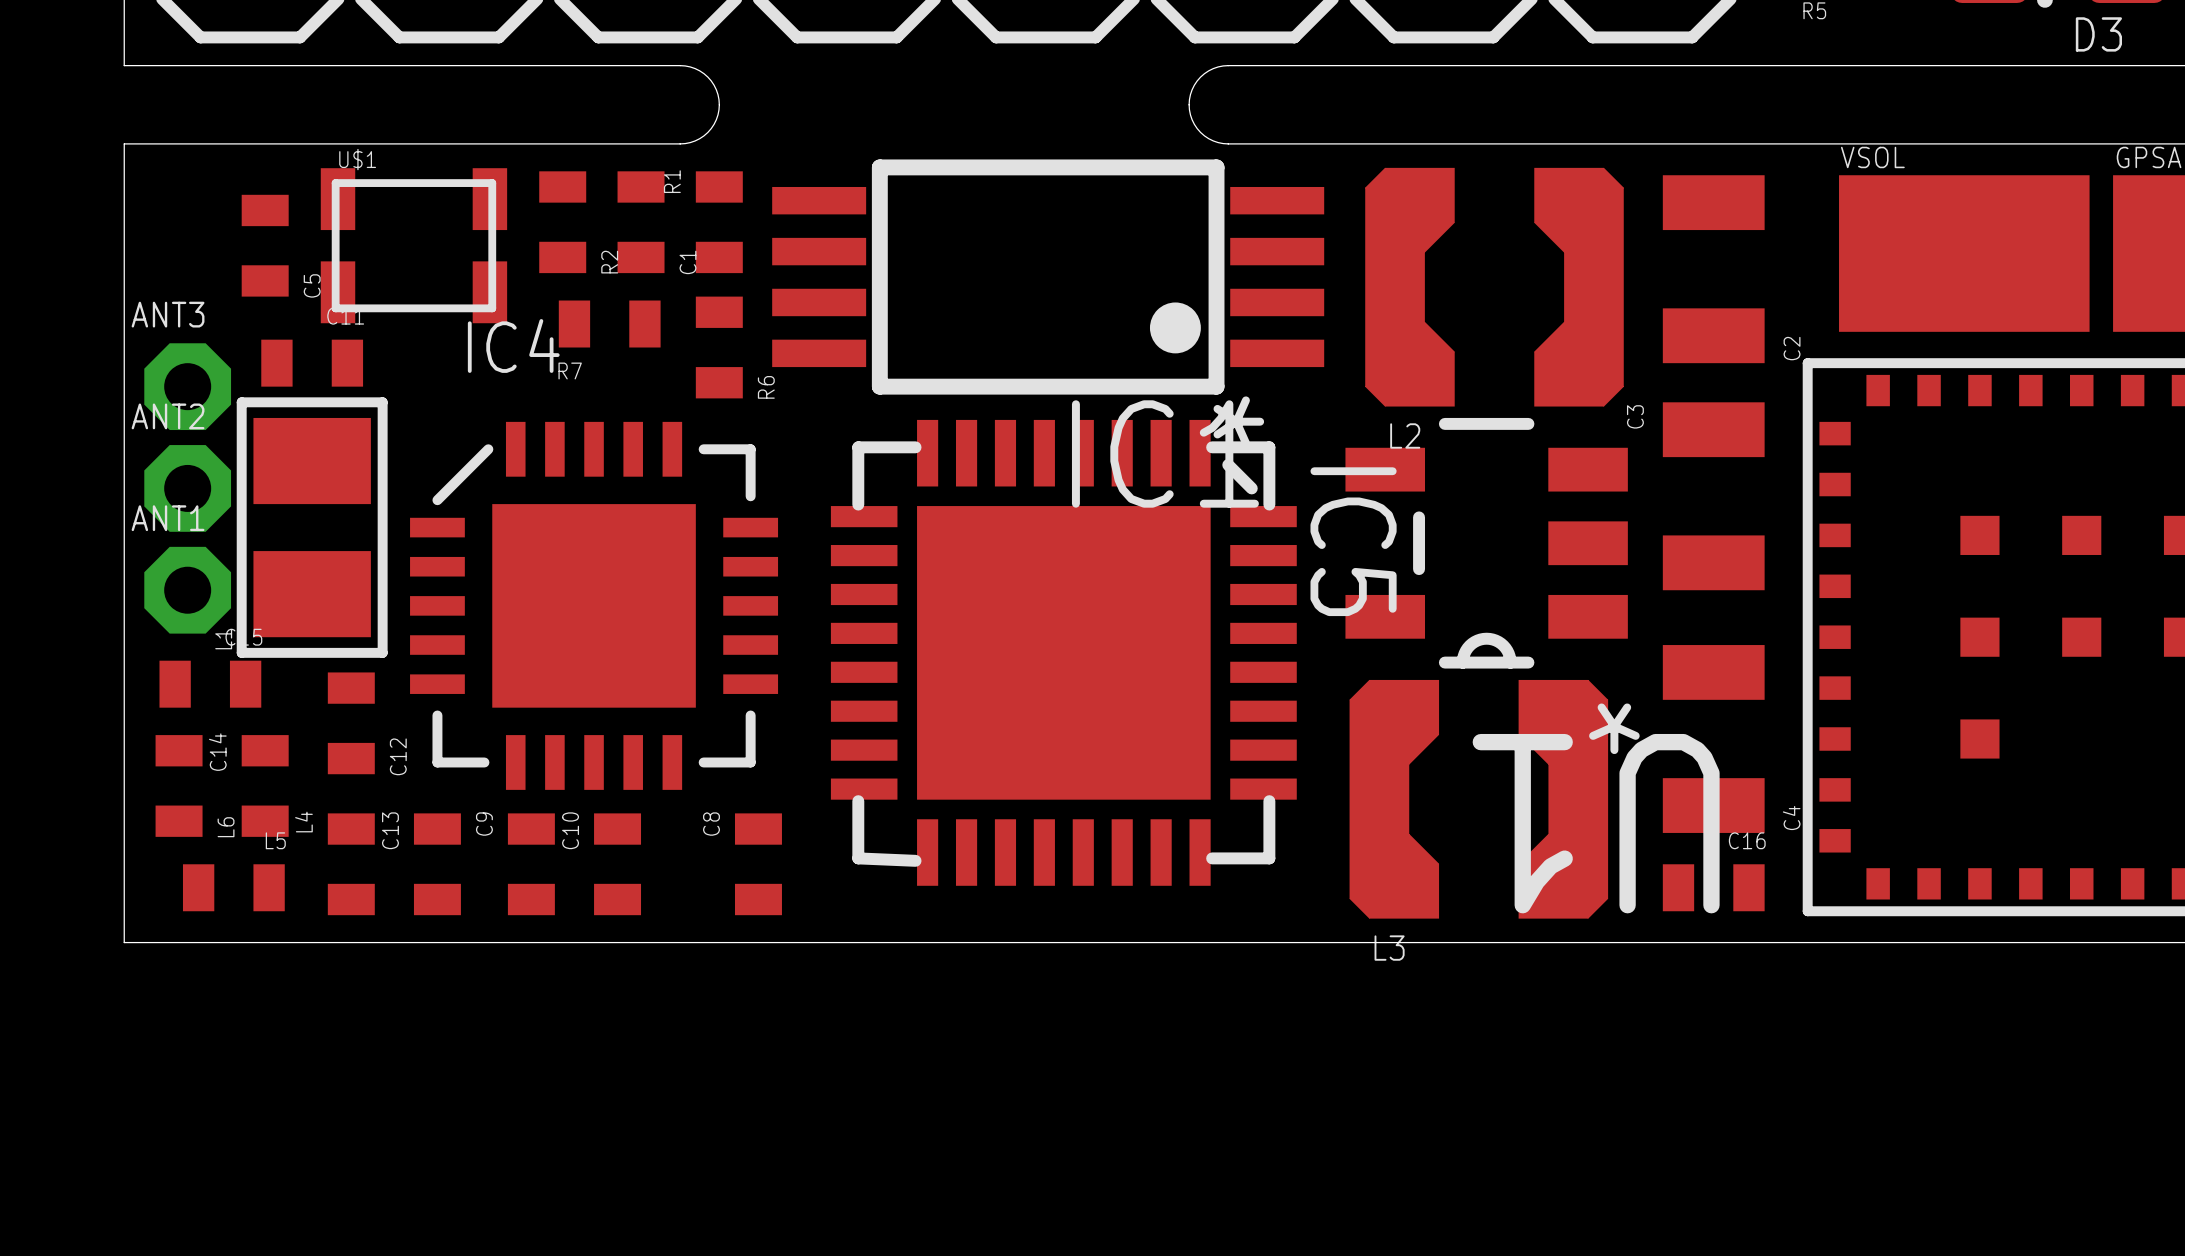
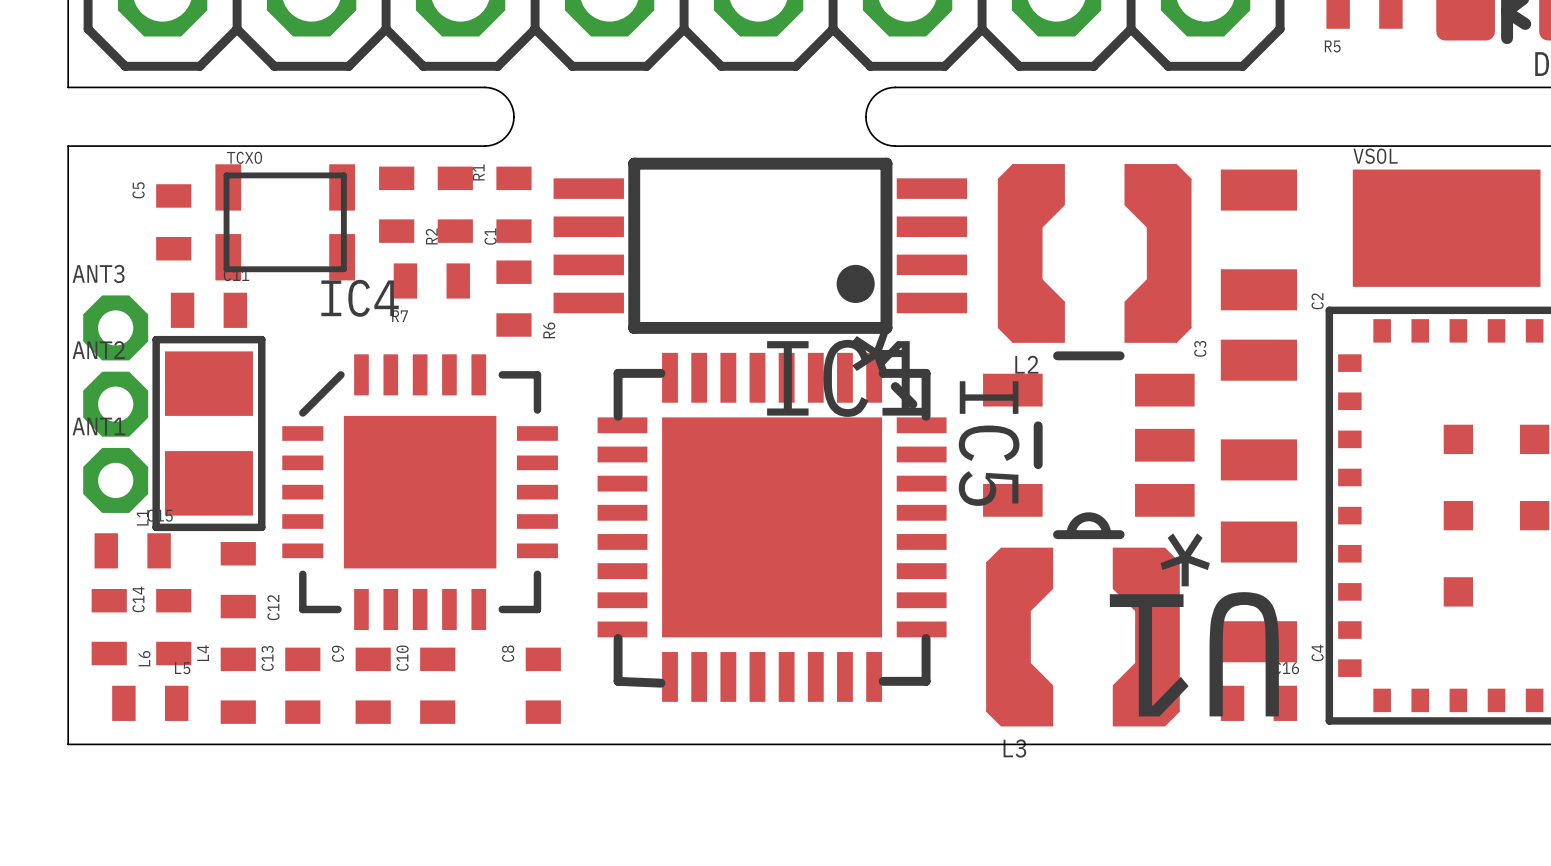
U$1 name: U$1 (357, 159) -> TCXO (244, 157)
C5 name position: C5 (312, 285) -> C5 (138, 190)

